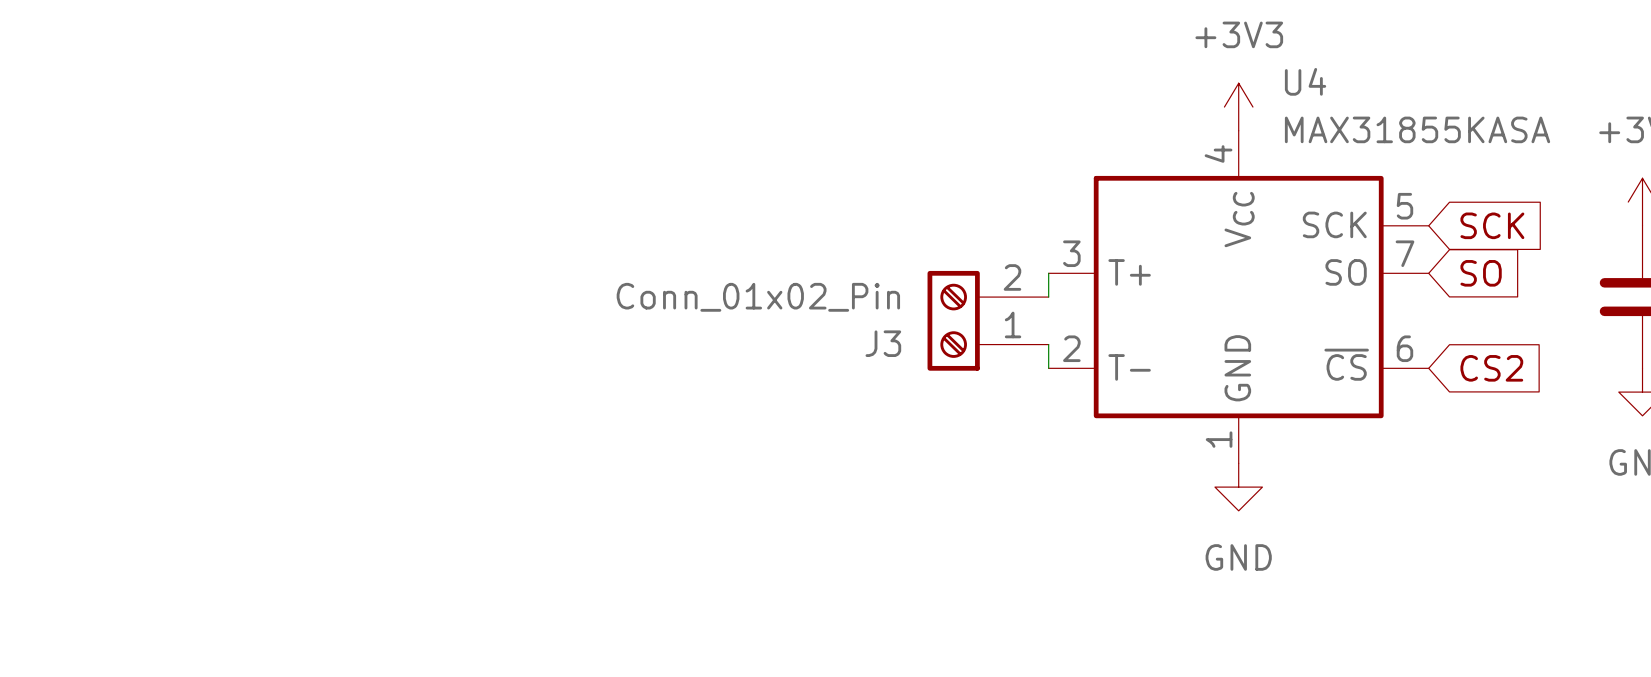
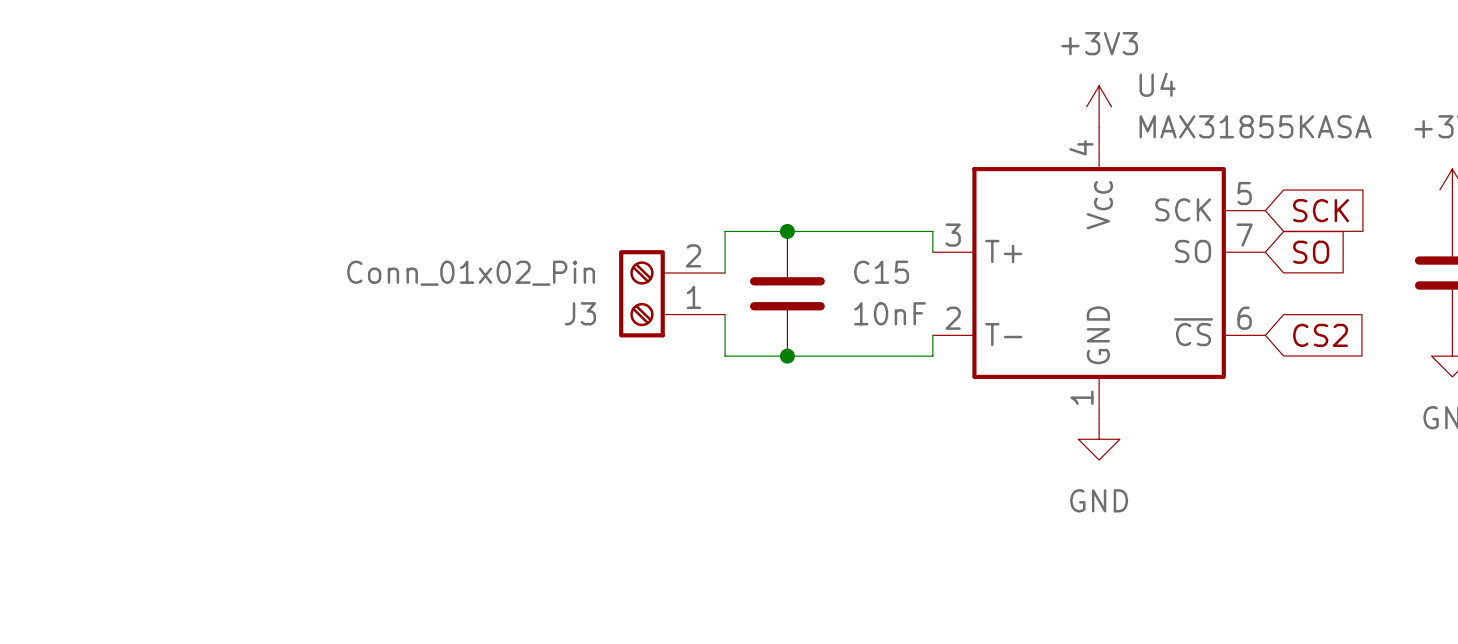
junction: none -> (787, 231)
wire: (1048, 273) (1048, 297) -> (932, 252) (932, 231) (725, 231) (725, 273)
C15: none -> 10nF (787, 293)
J3 position: (988, 320) -> (672, 293)
wire: (1048, 344) (1048, 368) -> (725, 314) (725, 356) (932, 356) (932, 335)
junction: none -> (787, 356)

